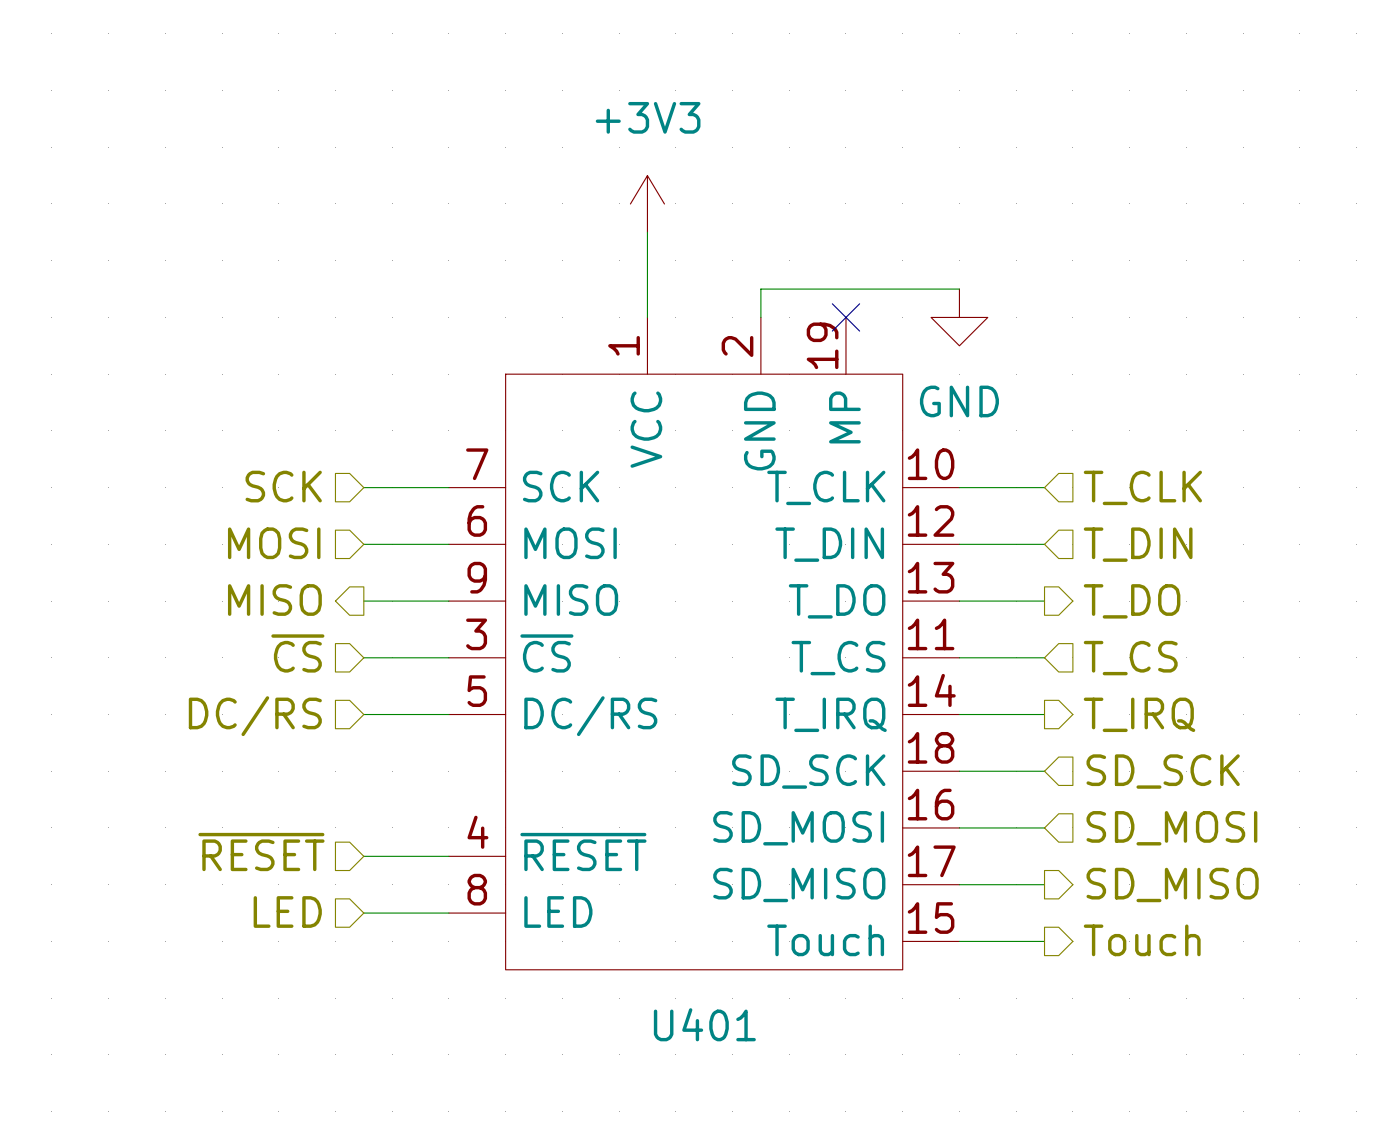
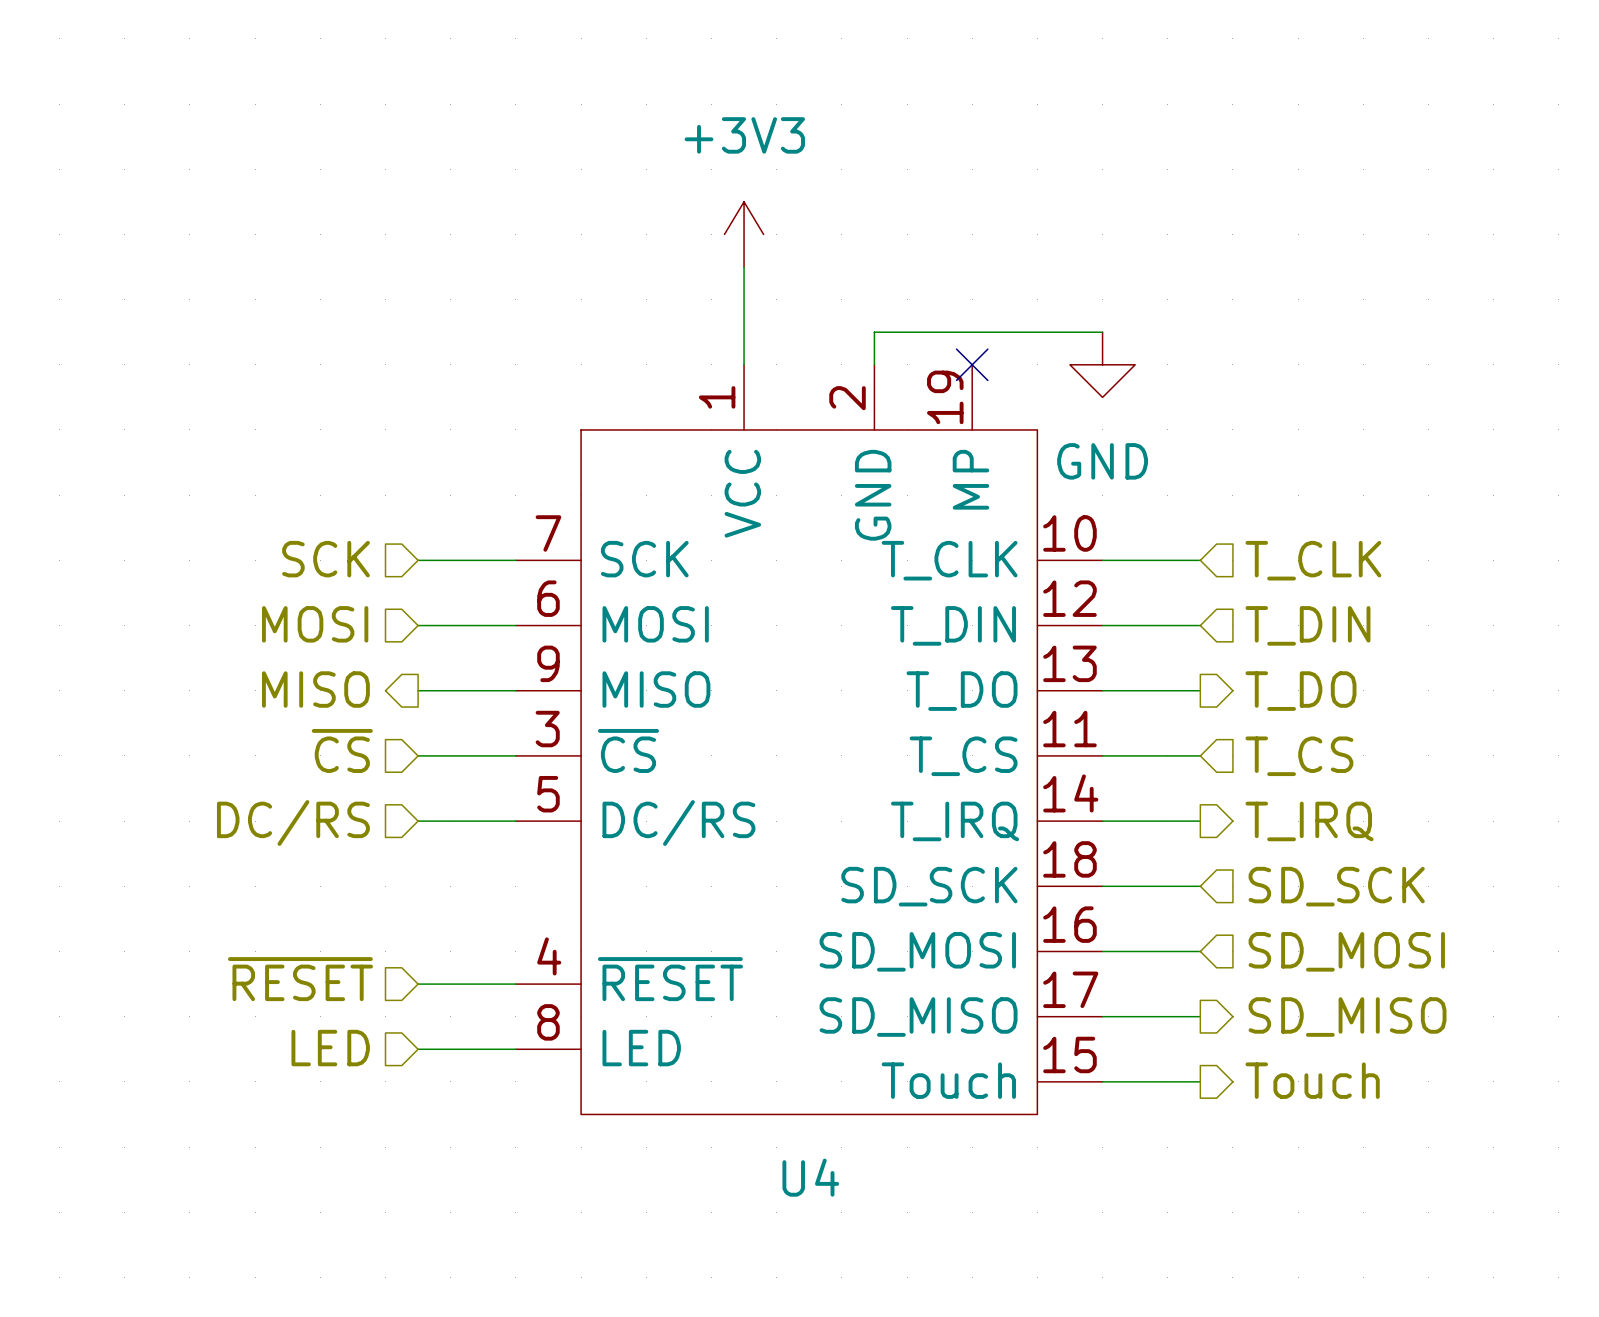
U401 name: U401 (704, 1024) -> U4 (810, 1177)

